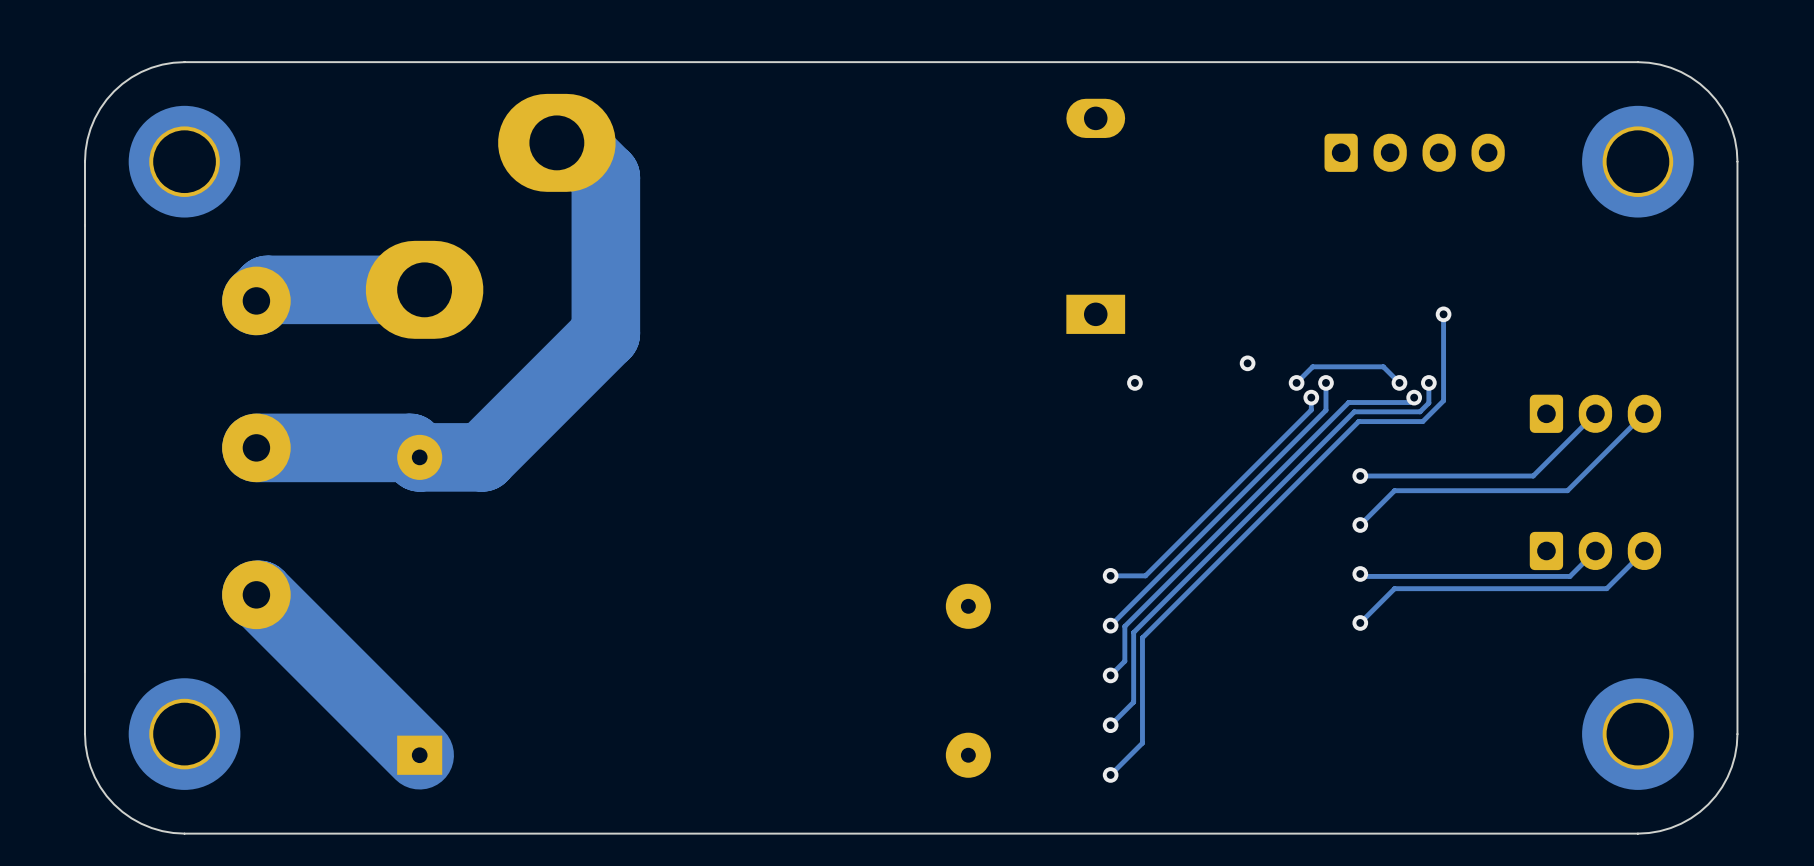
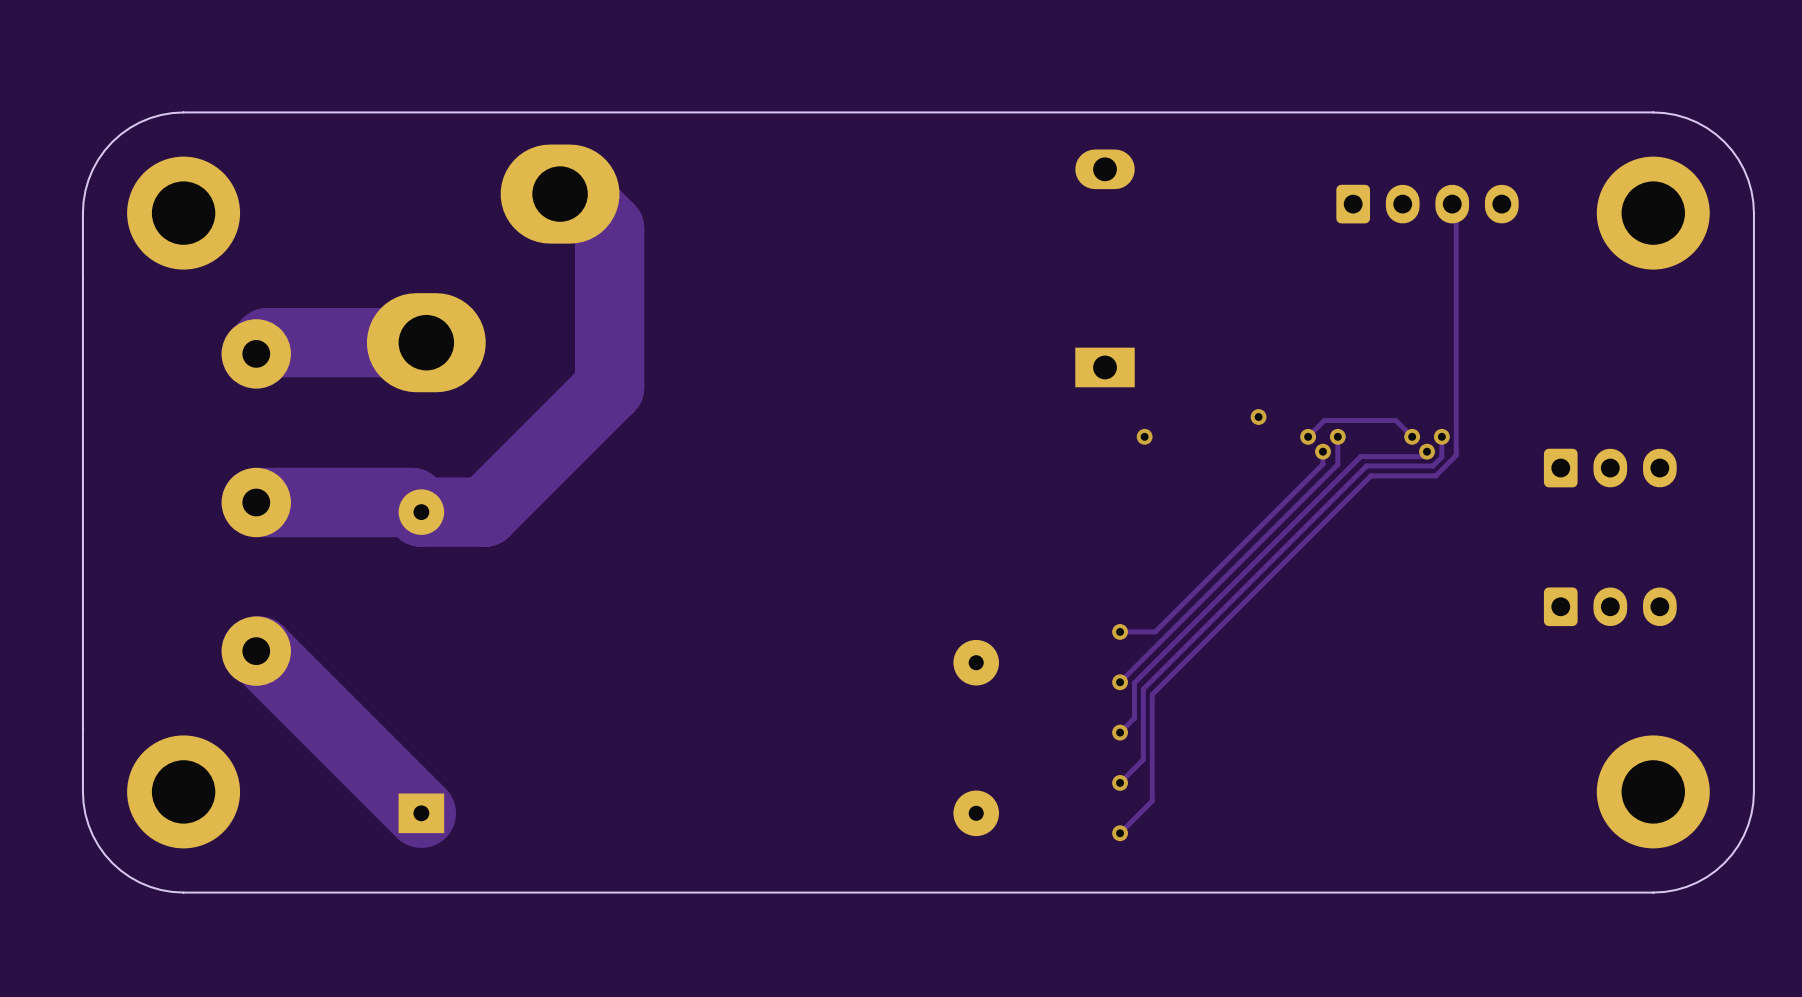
track: (1443, 314) (1443, 401) -> (1452, 204) (1456, 208) (1456, 455)
via: (1443, 314) -> none
track: (1595, 413) (1533, 476) (1360, 476) -> none
track: (1644, 413) (1567, 490) (1394, 490) (1360, 524) -> none
via: (1360, 476) -> none
via: (1360, 524) -> none
track: (1595, 550) (1569, 576) (1362, 576) (1360, 573) -> none
track: (1644, 550) (1606, 588) (1394, 588) (1360, 622) -> none
via: (1360, 573) -> none
via: (1360, 622) -> none

